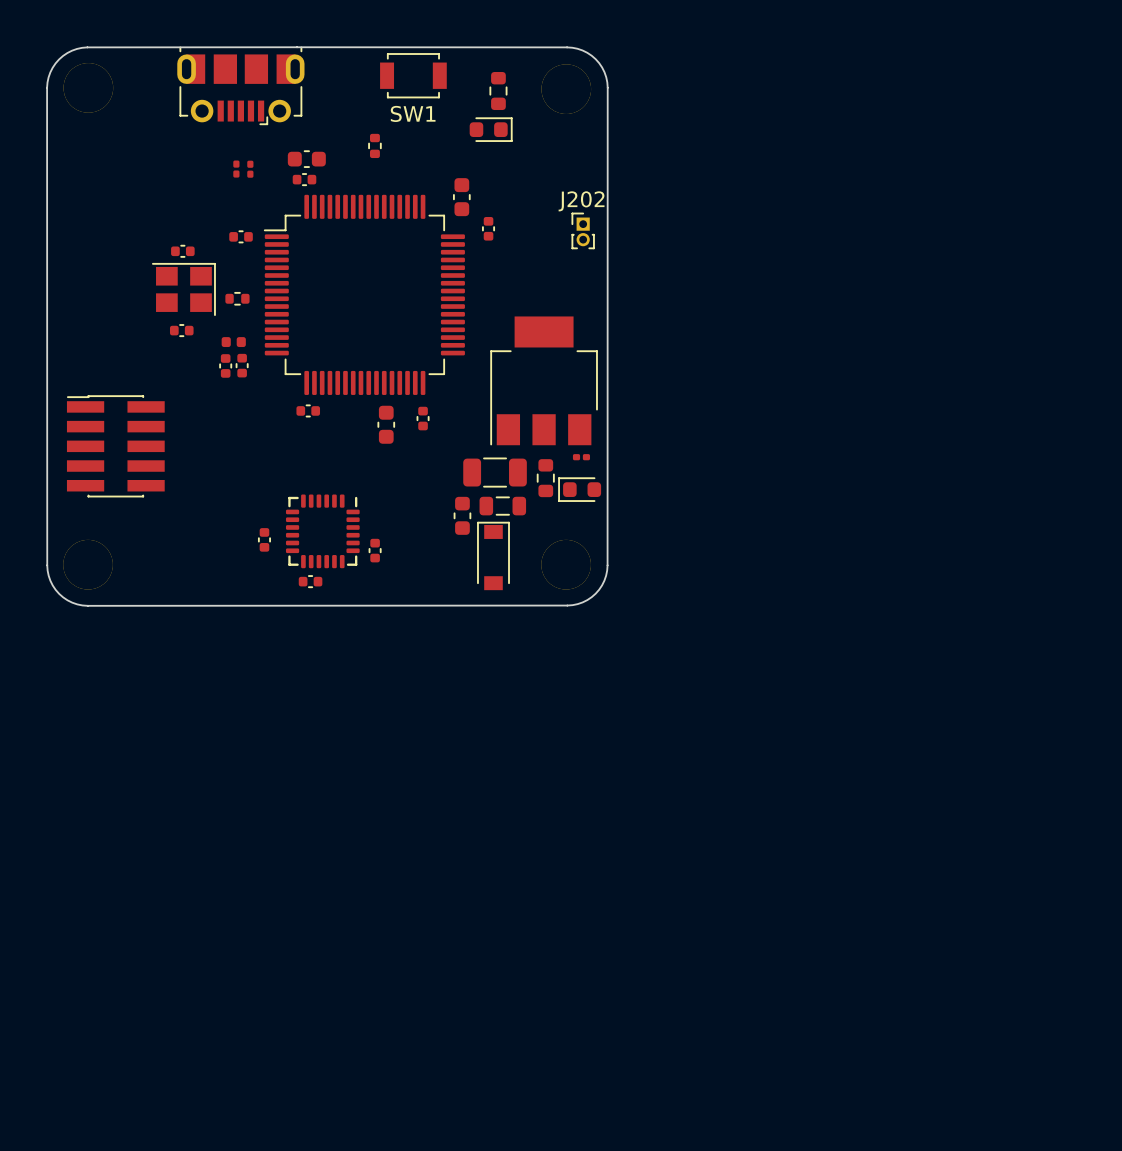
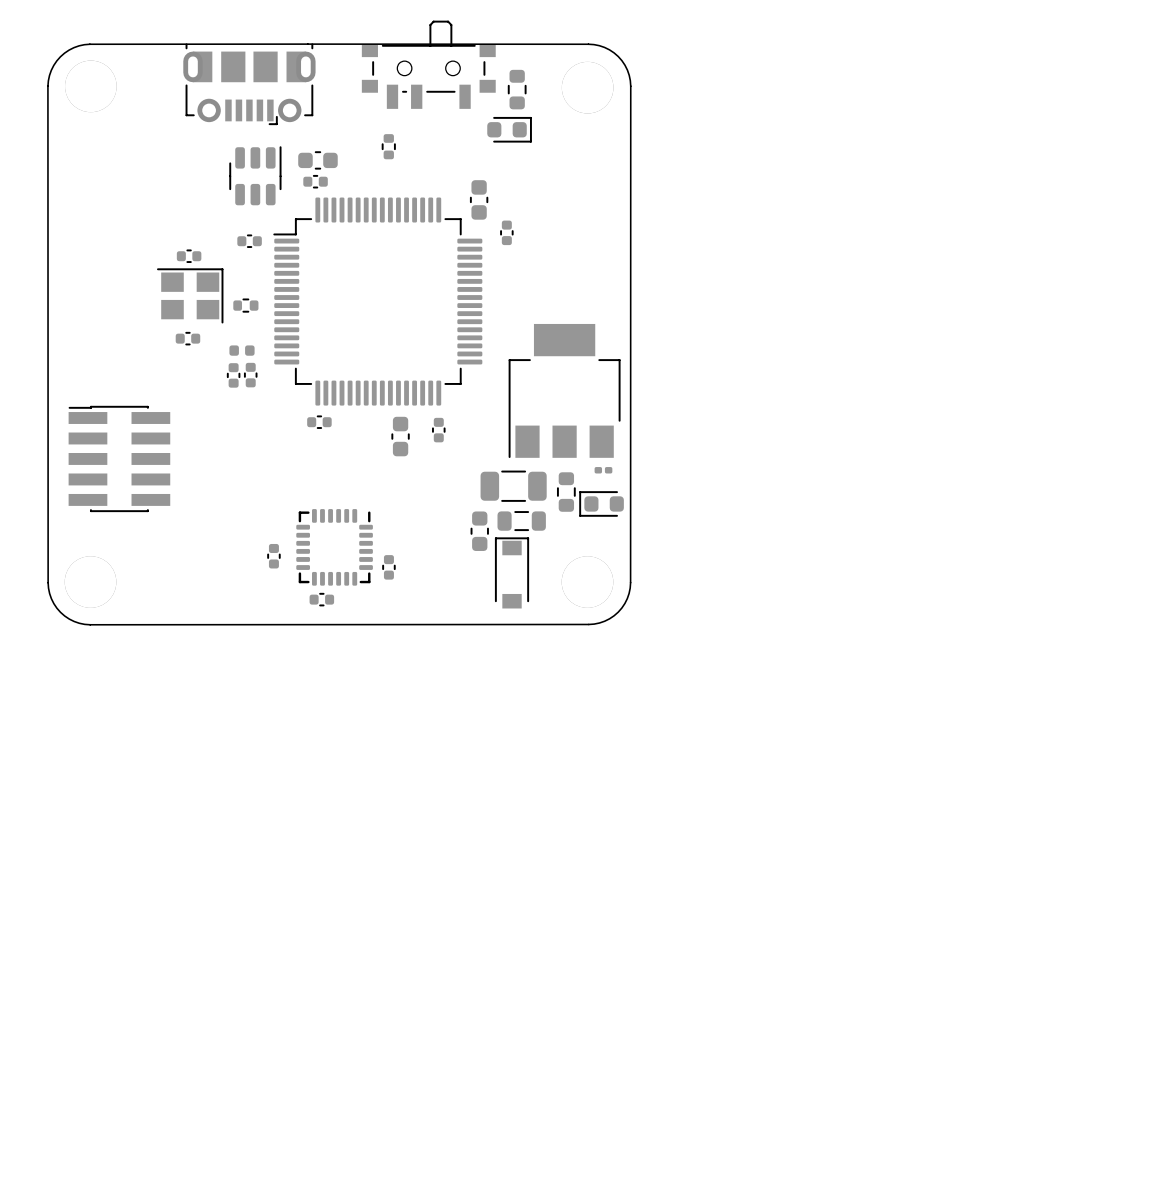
part: none -> (428, 64)
SW1: (413, 75) -> none
part: (236, 169) -> none
part: (250, 169) -> none
part: none -> (255, 175)
J202: (583, 230) -> none

